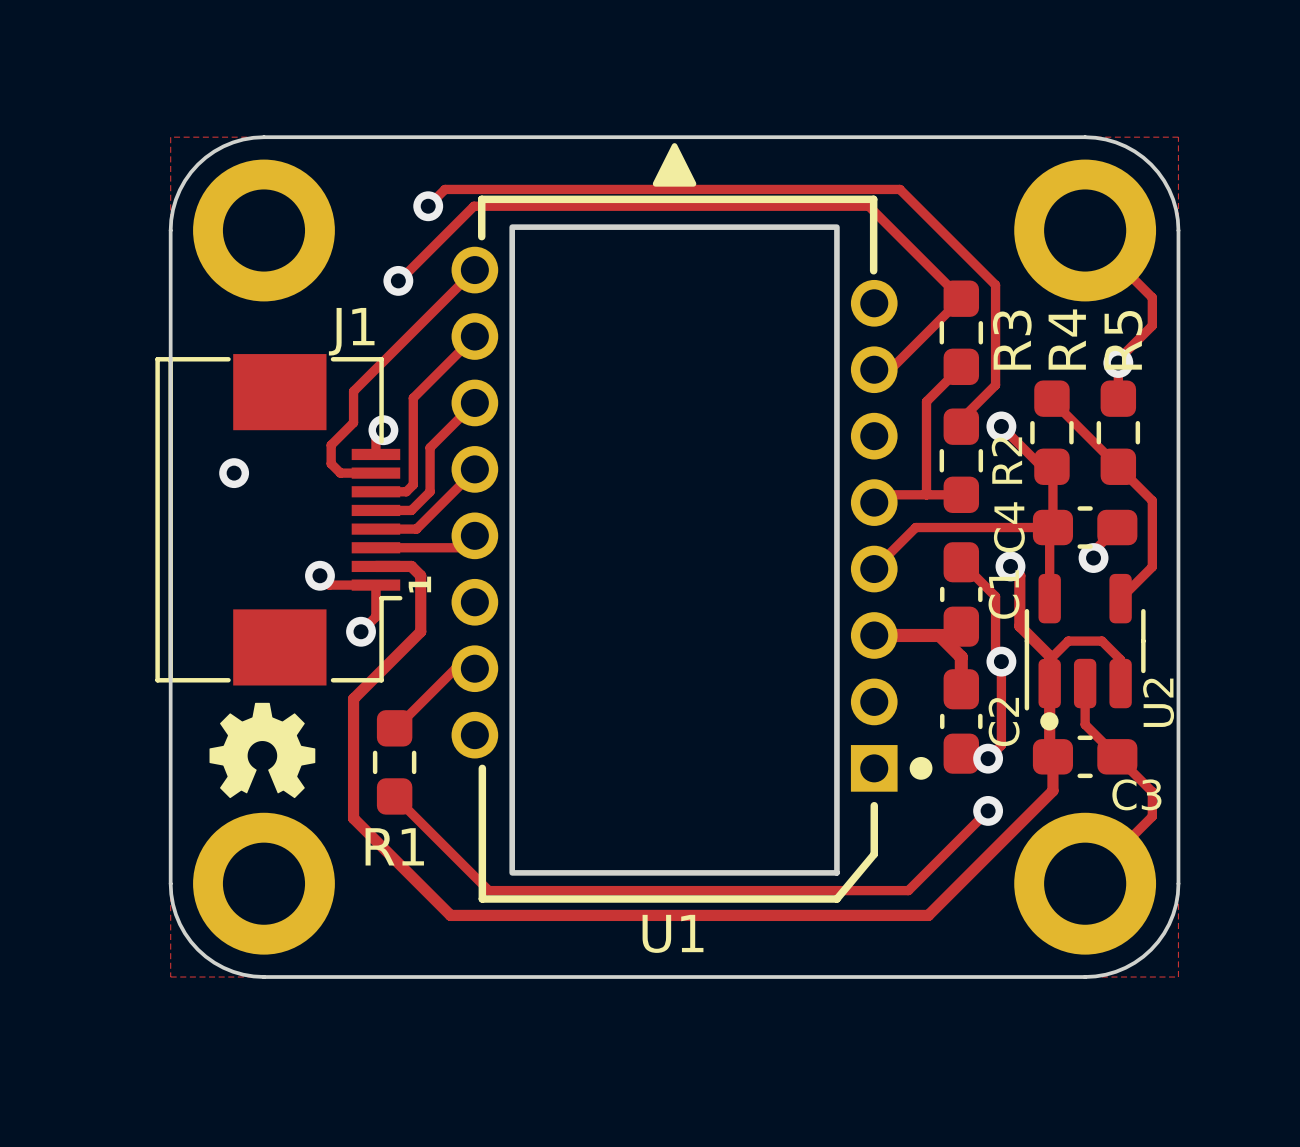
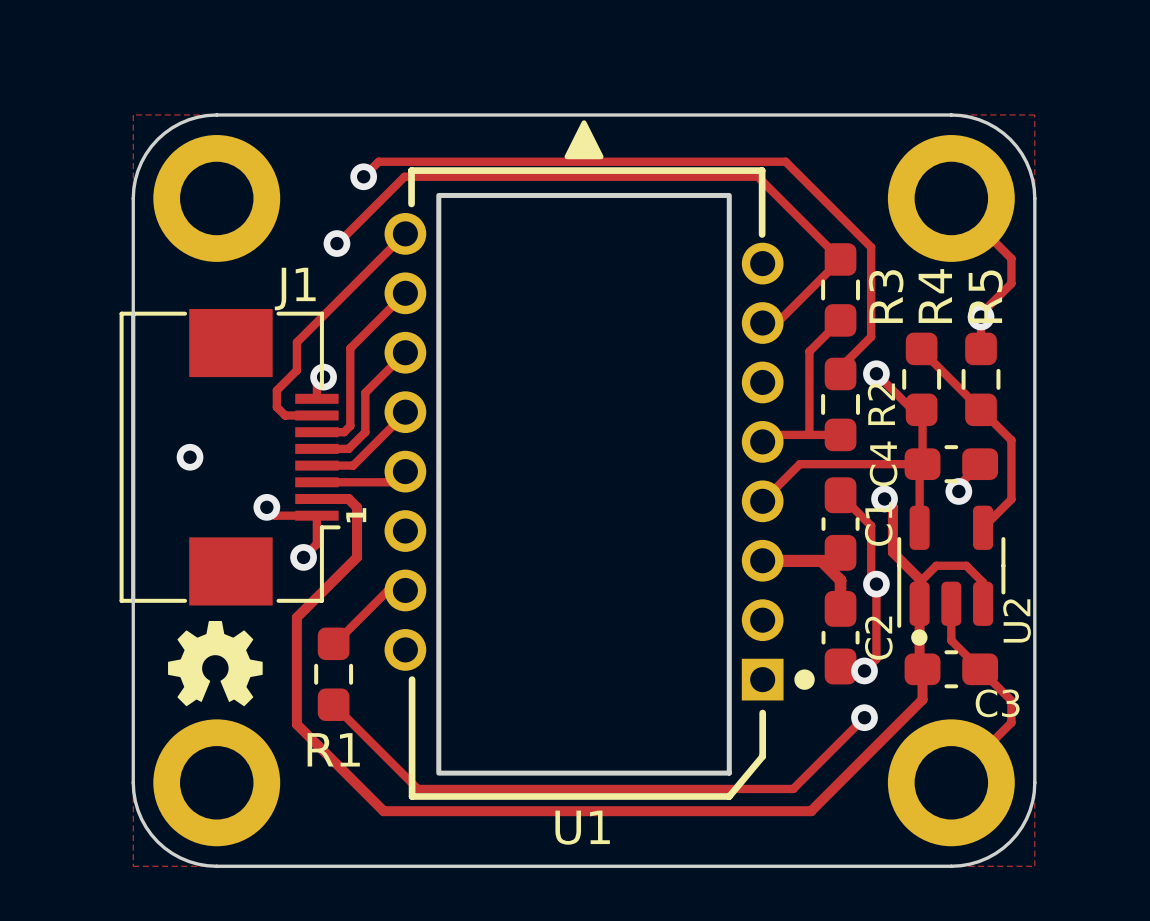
via position: (234, 473) -> (190, 457)

